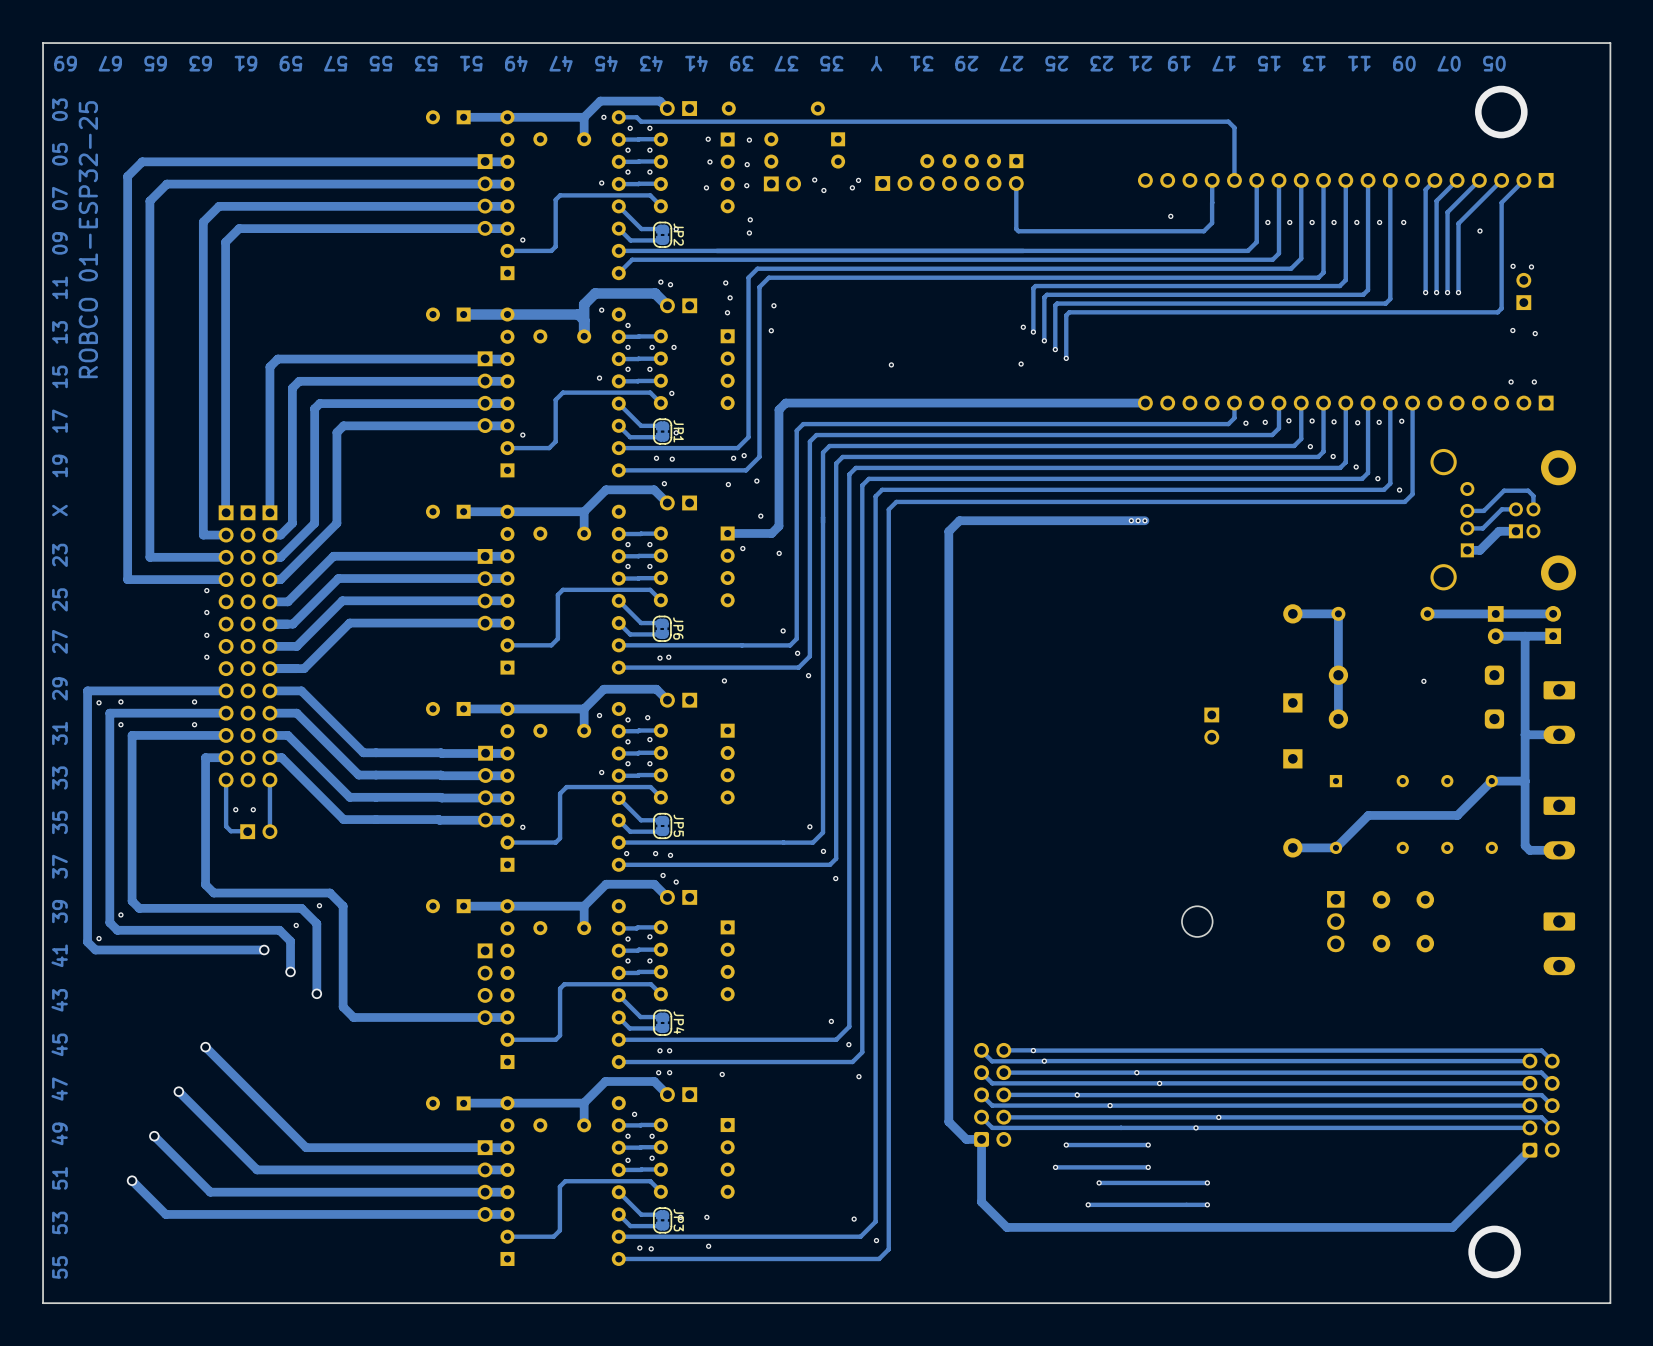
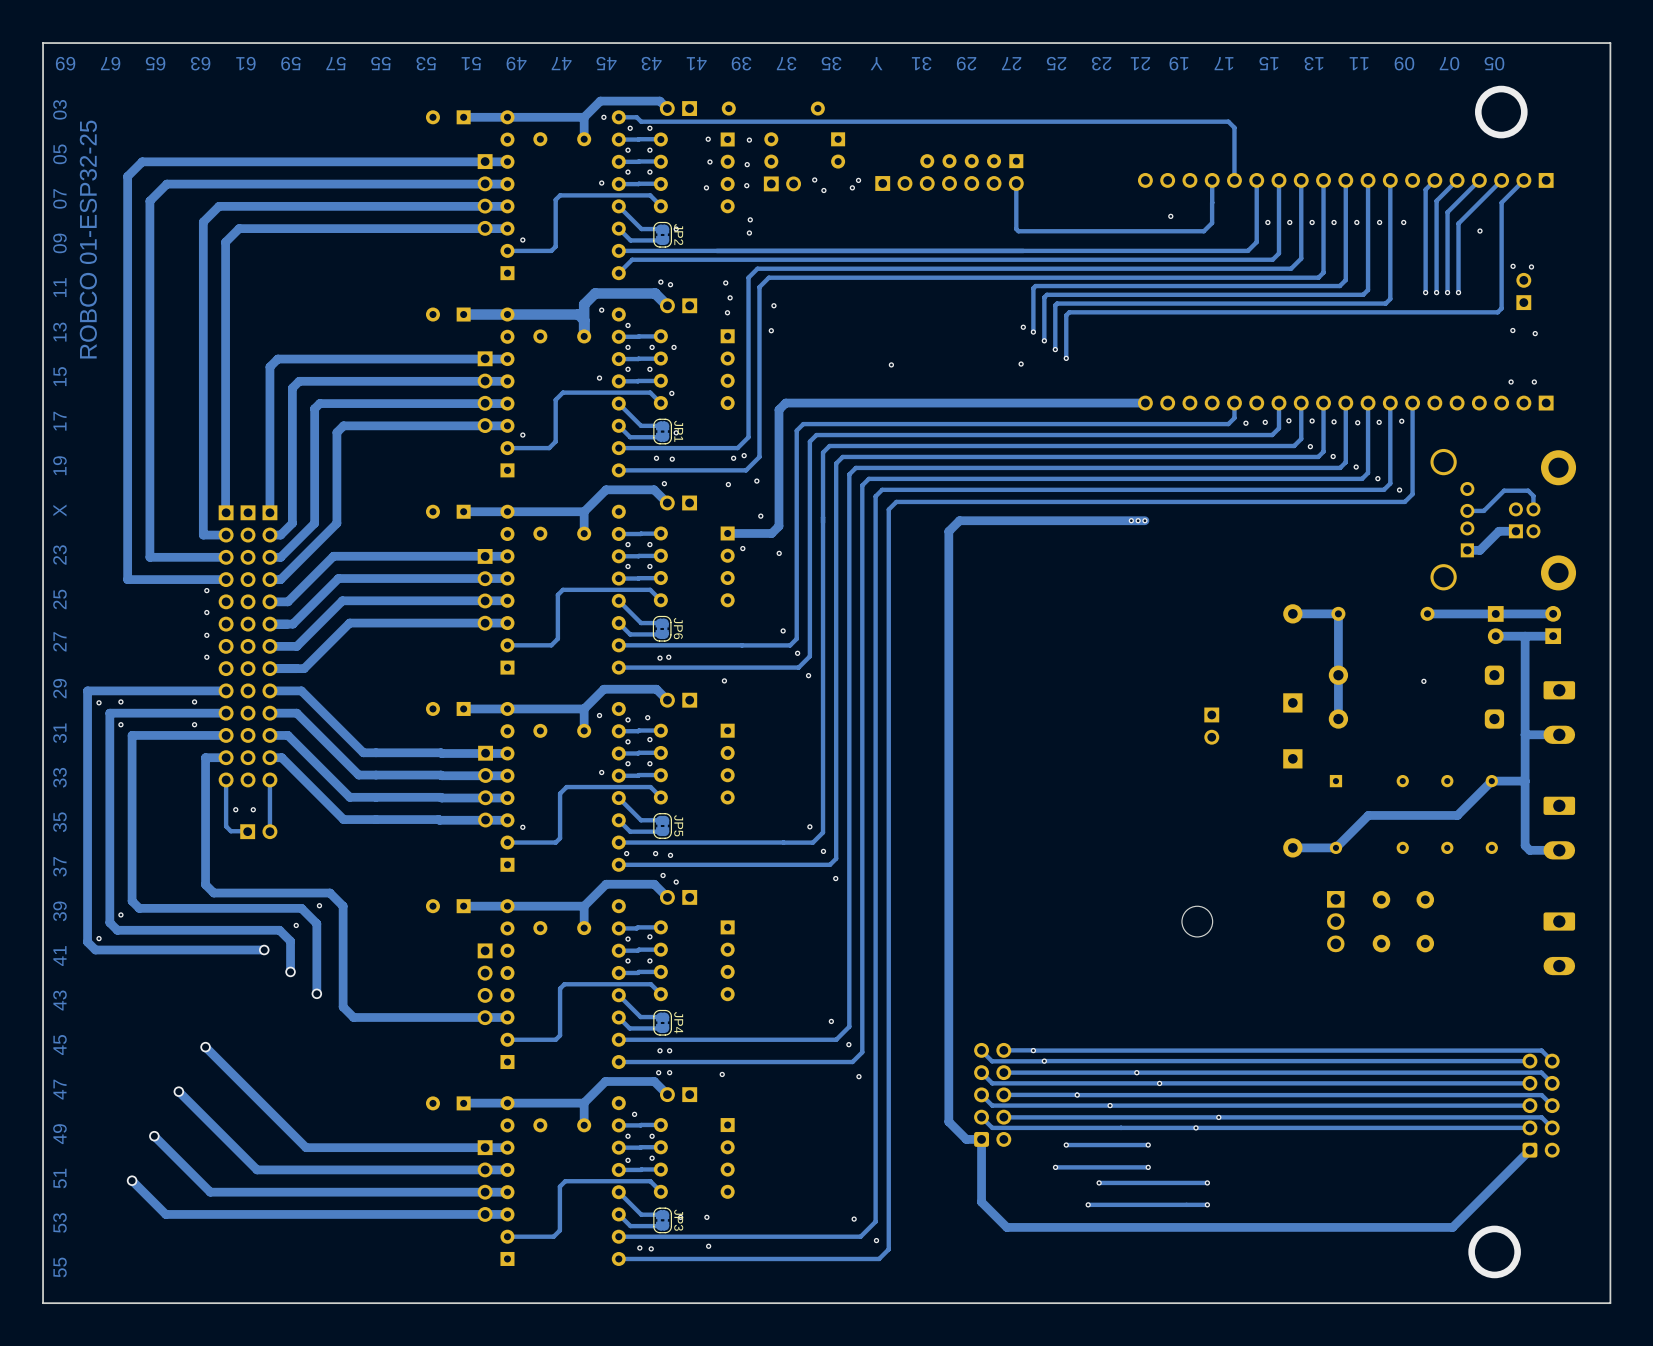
track: (1515, 509) (1501, 509) (1482, 528) (1467, 528) -> none

